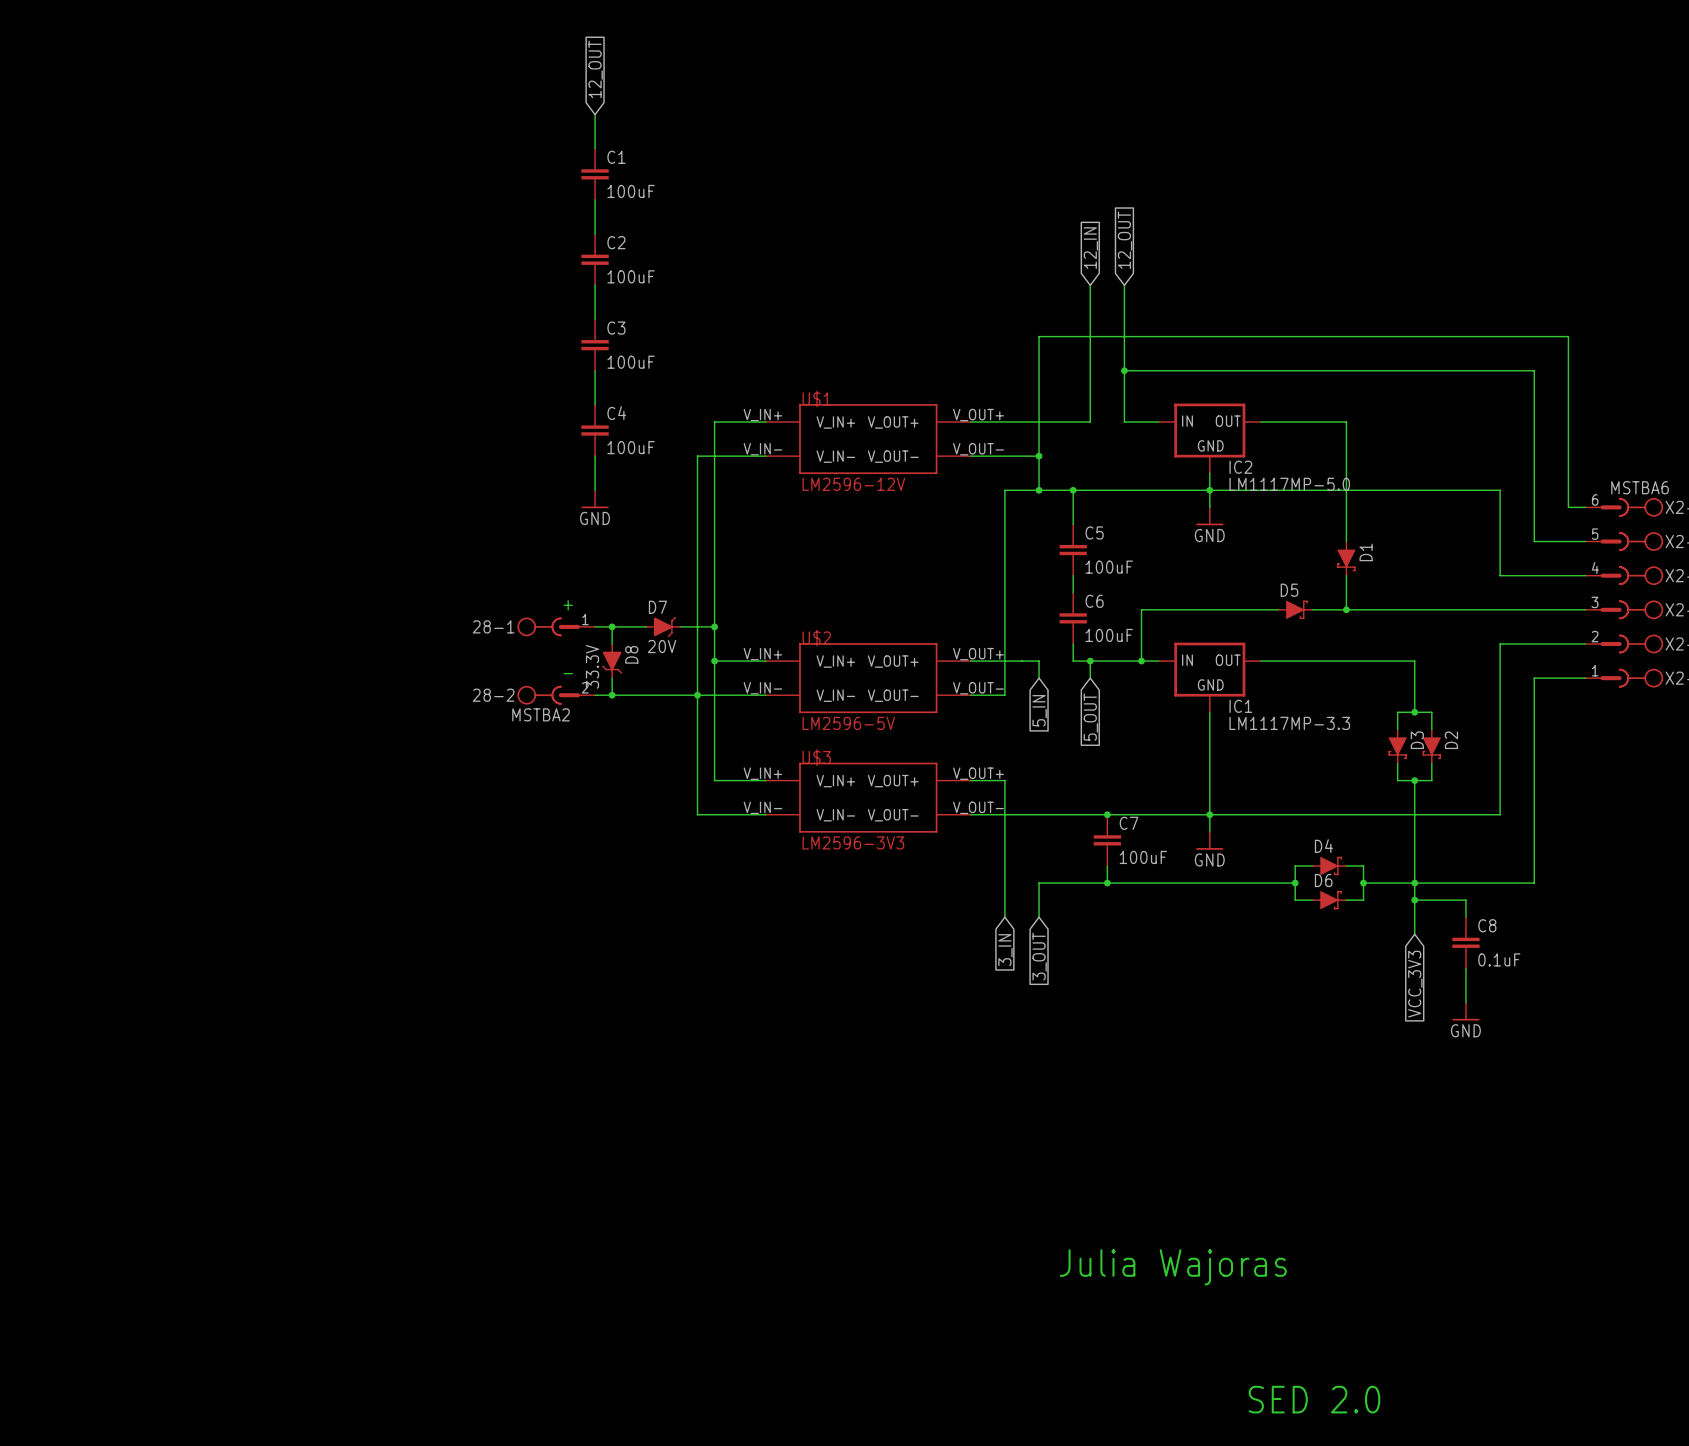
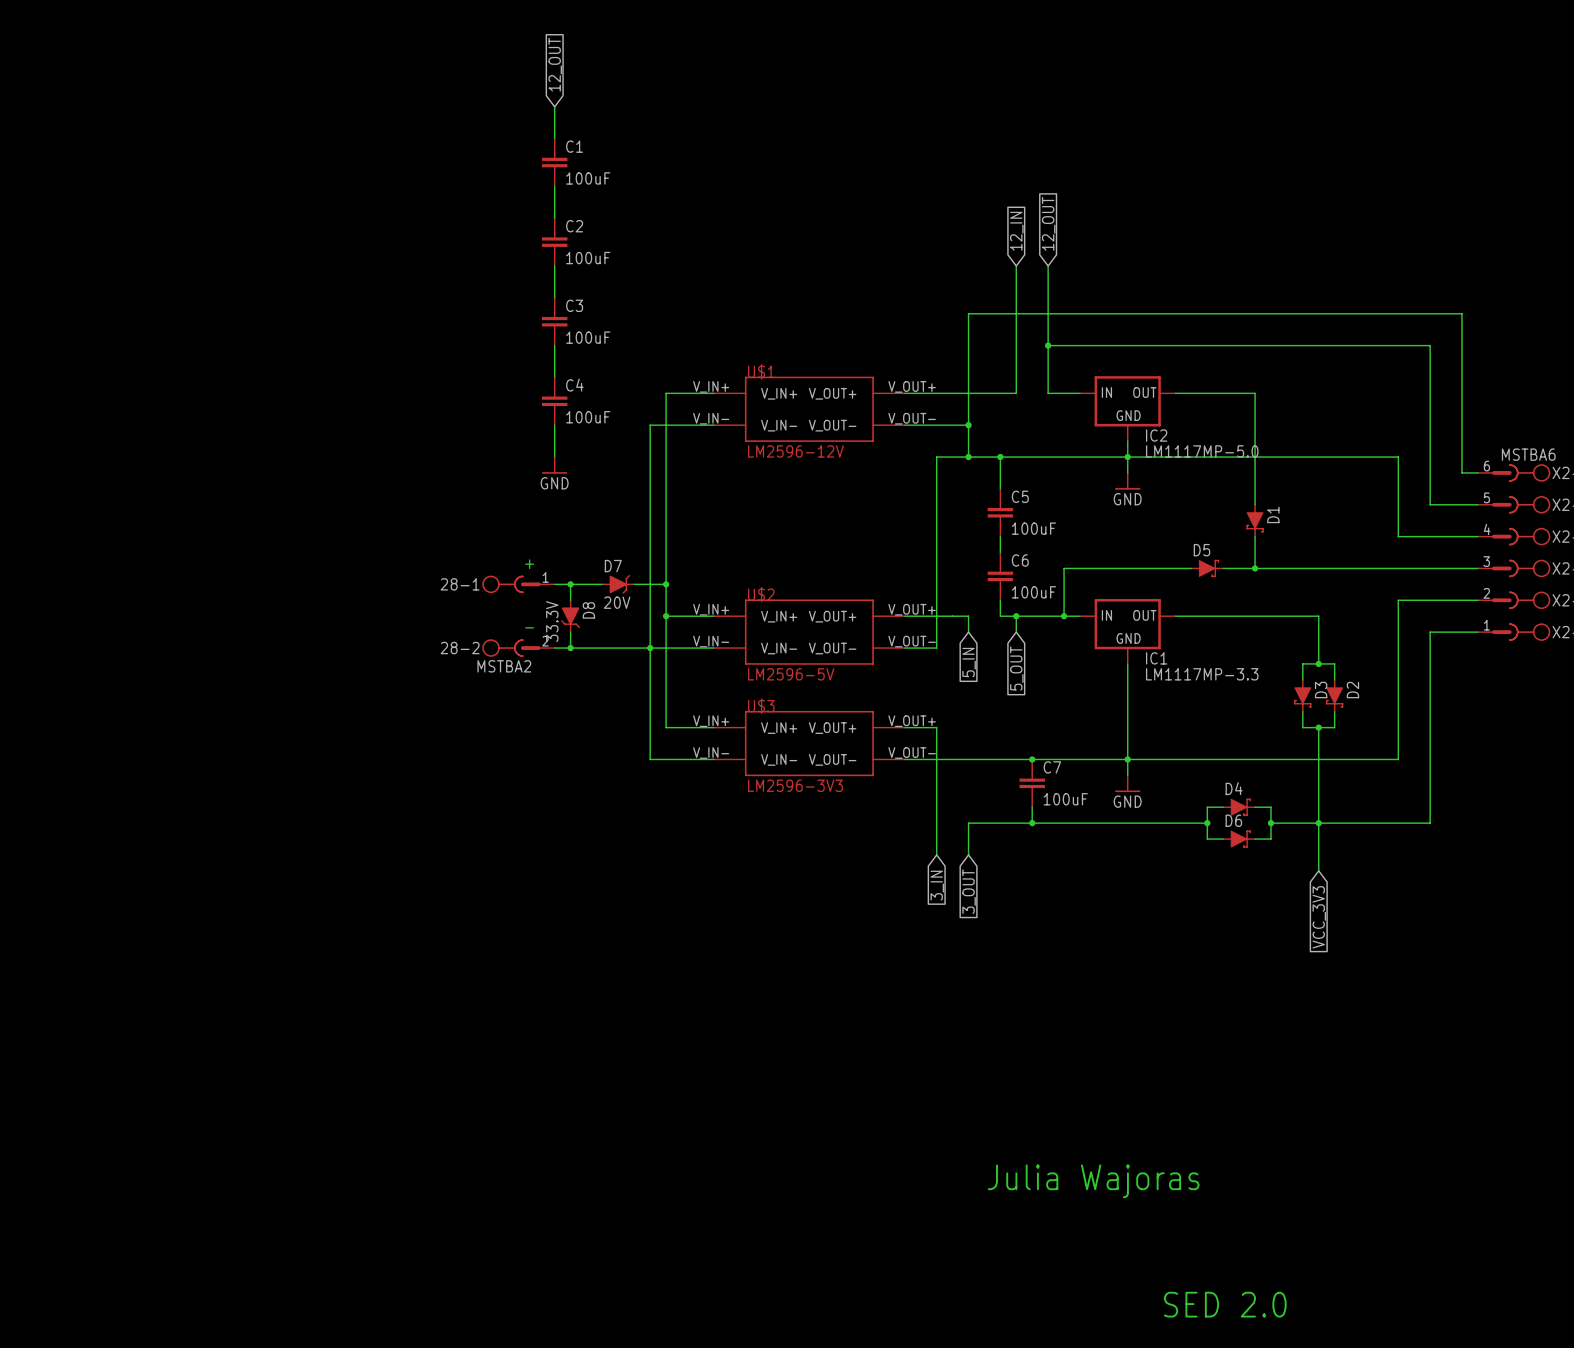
wire: (1414, 900) (1465, 900) (1465, 917) -> none
junction: (1414, 900) -> none
C8: 0.1uF (1465, 942) -> none
wire: (1465, 968) (1465, 1002) -> none
power symbol: GND (1465, 1011) -> none

